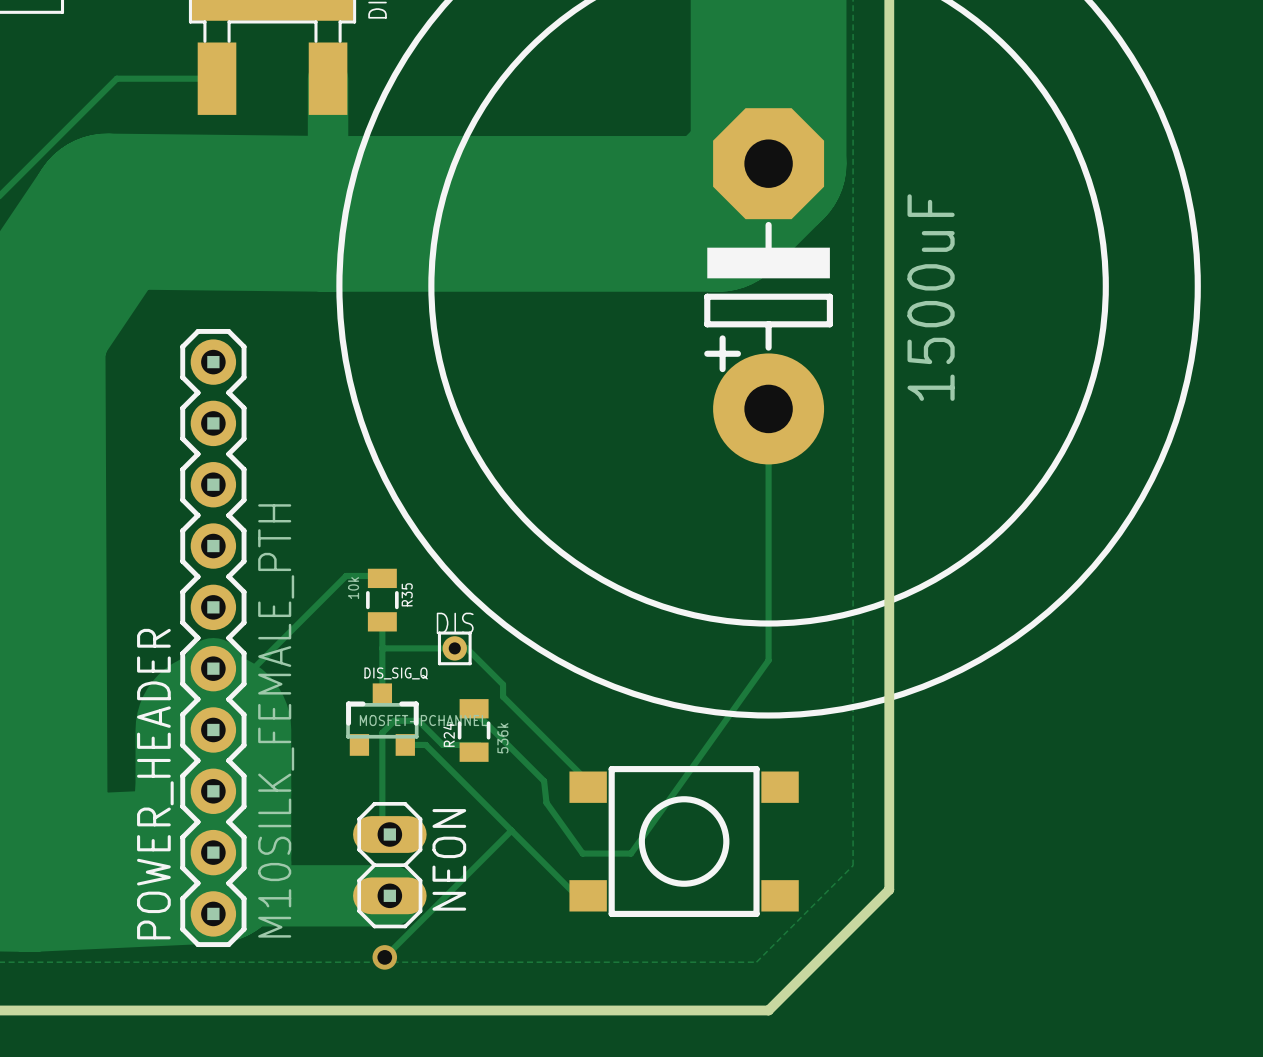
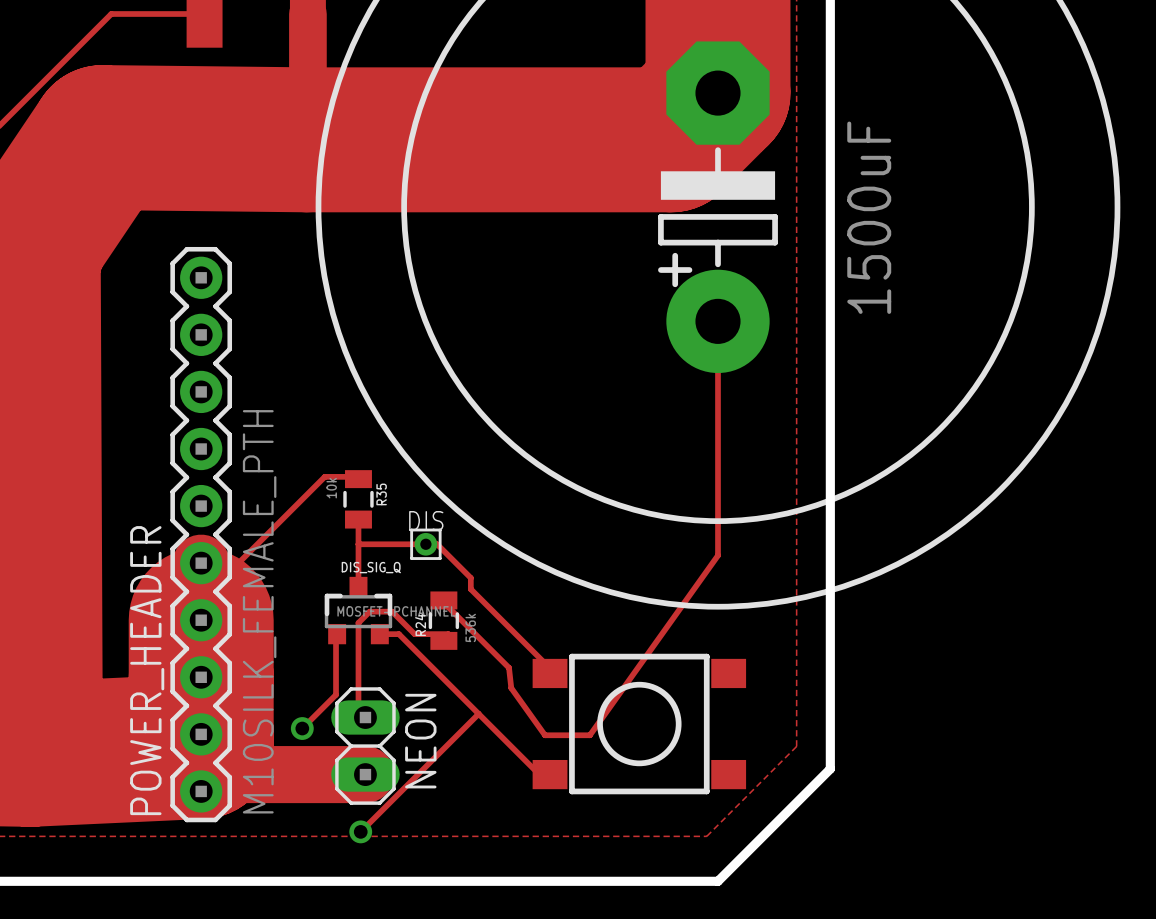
track: none -> (337, 634) (336, 694) (302, 728)
via: none -> (302, 728)

